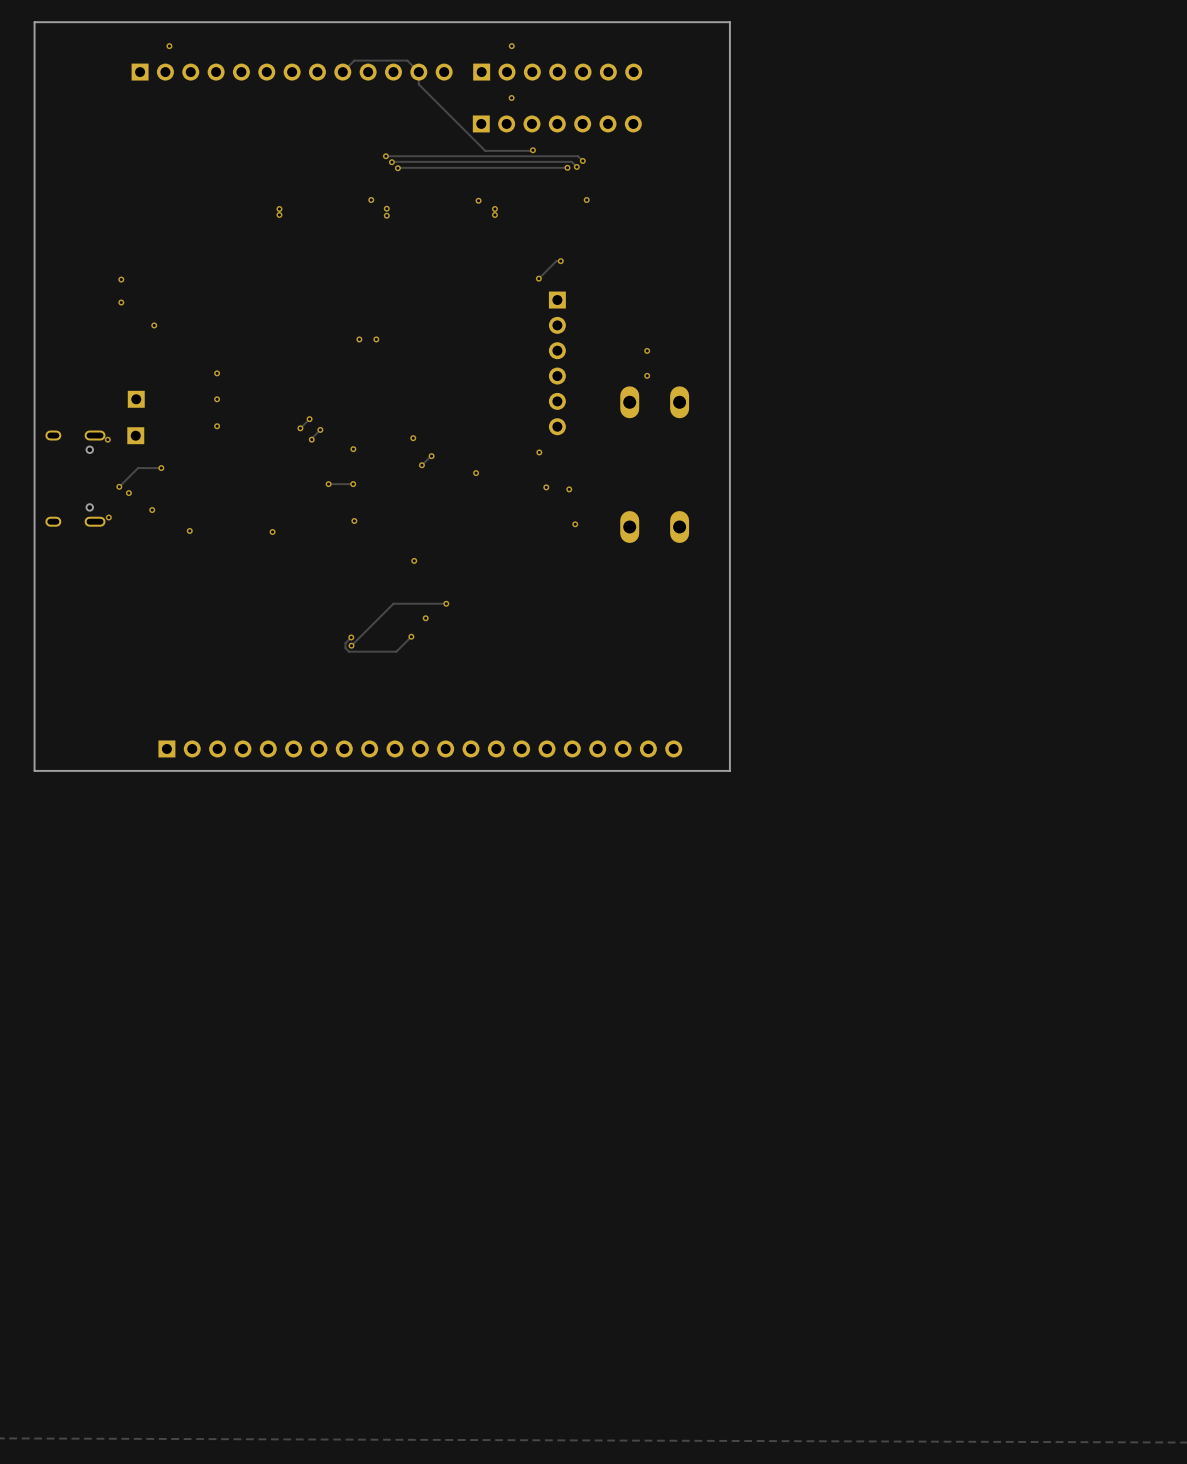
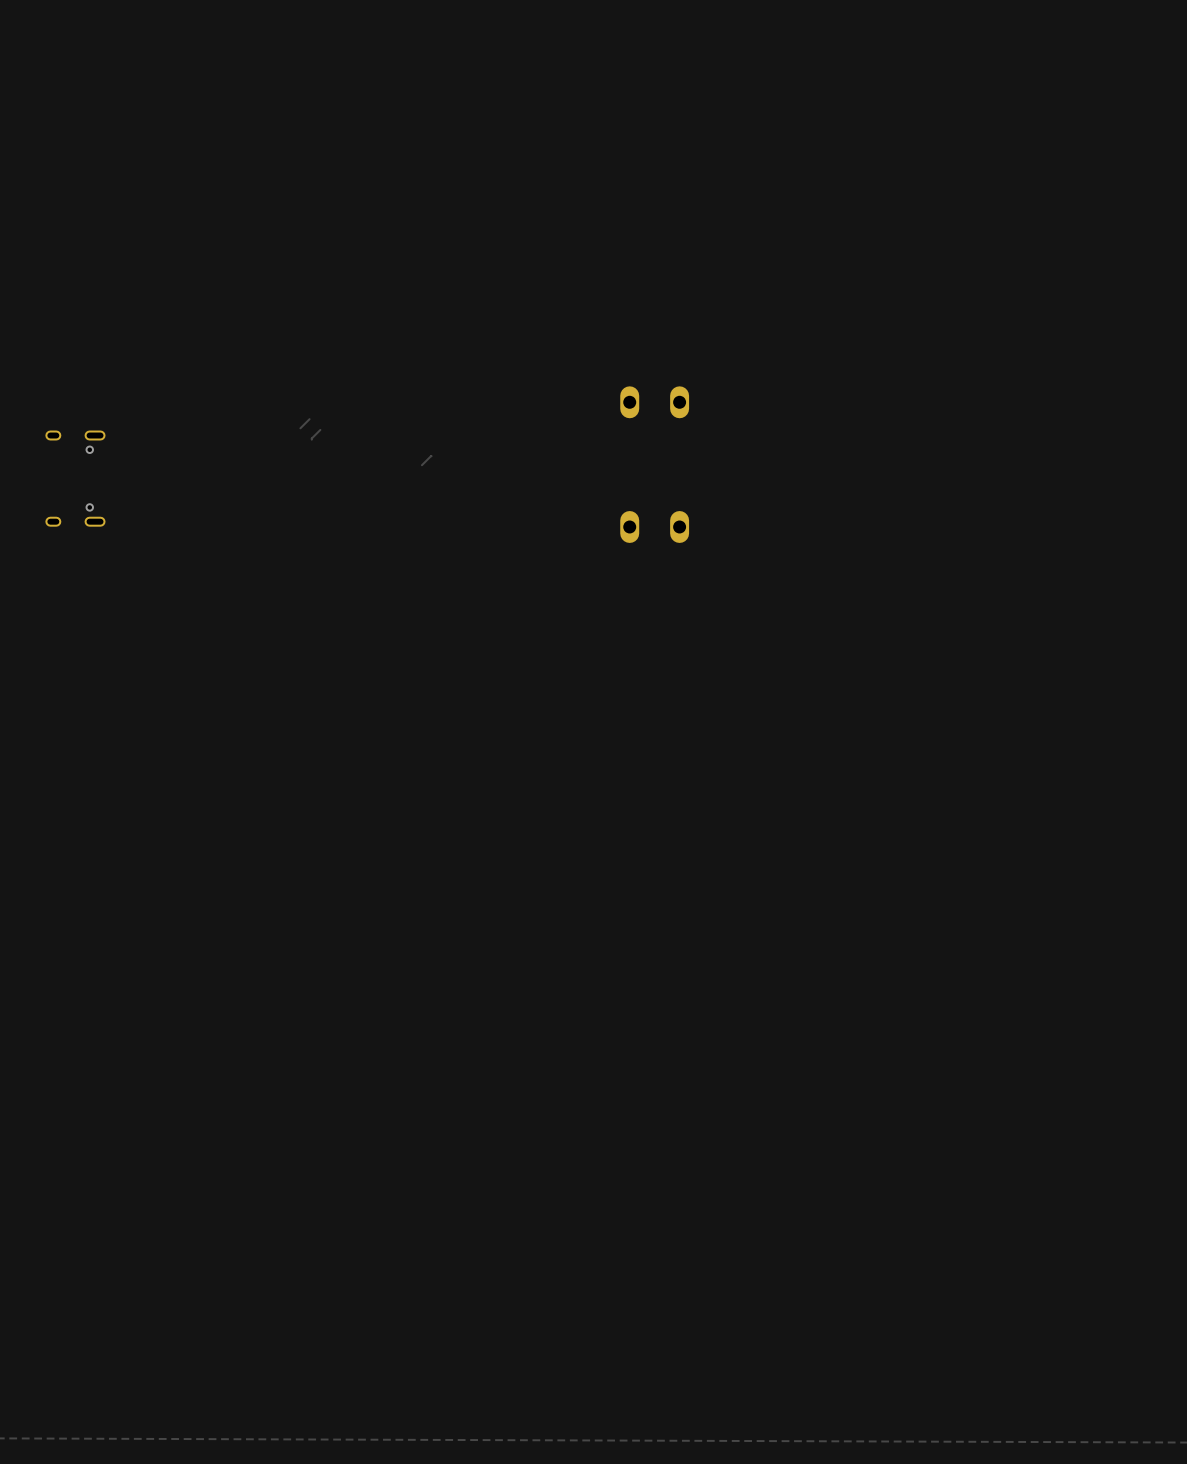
board edge: (729, 22) (34, 22) (34, 770) (729, 770) (729, 22) -> none
via: (169, 46) -> none
via: (511, 46) -> none
part: (292, 72) -> none
track: (342, 72) (354, 60) (407, 60) (418, 72) (418, 84) (485, 150) (532, 150) -> none
part: (557, 72) -> none
via: (511, 98) -> none
part: (557, 123) -> none
via: (532, 150) -> none
track: (385, 156) (578, 156) (582, 160) -> none
via: (385, 156) -> none
via: (582, 160) -> none
track: (391, 162) (571, 161) (576, 166) -> none
via: (391, 162) -> none
via: (576, 166) -> none
track: (567, 167) (397, 168) -> none
via: (567, 167) -> none
via: (397, 168) -> none
via: (371, 200) -> none
via: (478, 200) -> none
via: (586, 200) -> none
via: (279, 208) -> none
via: (386, 208) -> none
via: (494, 208) -> none
via: (279, 214) -> none
via: (494, 214) -> none
via: (386, 215) -> none
track: (560, 261) (556, 261) (538, 278) -> none
via: (560, 261) -> none
via: (538, 278) -> none
via: (121, 279) -> none
via: (121, 302) -> none
via: (154, 325) -> none
via: (359, 339) -> none
via: (376, 339) -> none
via: (647, 350) -> none
part: (557, 363) -> none
via: (217, 373) -> none
via: (647, 375) -> none
part: (136, 399) -> none
via: (217, 399) -> none
via: (309, 419) -> none
via: (217, 426) -> none
via: (300, 428) -> none
via: (320, 429) -> none
part: (135, 435) -> none
via: (413, 438) -> none
via: (107, 439) -> none
via: (311, 439) -> none
via: (353, 449) -> none
via: (539, 452) -> none
via: (431, 456) -> none
via: (421, 465) -> none
track: (161, 468) (138, 468) (119, 486) -> none
via: (161, 468) -> none
via: (476, 473) -> none
via: (328, 484) -> none
track: (353, 484) (328, 484) -> none
via: (353, 484) -> none
via: (119, 486) -> none
via: (546, 487) -> none
via: (569, 489) -> none
via: (128, 493) -> none
via: (152, 510) -> none
via: (108, 517) -> none
via: (354, 521) -> none
via: (575, 524) -> none
via: (189, 530) -> none
via: (272, 531) -> none
via: (414, 560) -> none
track: (446, 603) (393, 603) (351, 645) -> none
via: (446, 603) -> none
via: (425, 618) -> none
track: (411, 636) (396, 651) (349, 651) (345, 648) (345, 643) (351, 637) -> none
via: (411, 636) -> none
via: (351, 637) -> none
via: (351, 645) -> none
part: (420, 748) -> none

